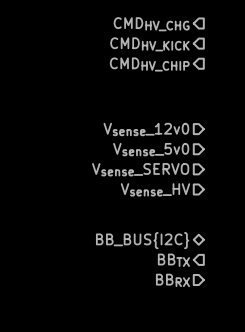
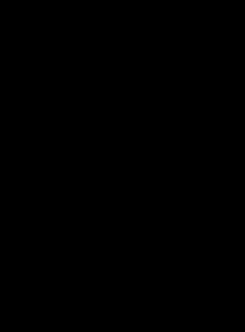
hierarchical label: CMDHV_CHG (151, 24) -> none
hierarchical label: CMDHV_KICK (149, 44) -> none
hierarchical label: CMDHV_CHIP (149, 64) -> none
hierarchical label: Vsense_12v0 (146, 129) -> none
hierarchical label: Vsense_5v0 (151, 149) -> none
hierarchical label: Vsense_SERVO (140, 169) -> none
hierarchical label: Vsense_HV (155, 189) -> none
hierarchical label: BB_BUS{I2C} (142, 240) -> none
hierarchical label: BBTX (173, 260) -> none
hierarchical label: BBRX (172, 280) -> none

